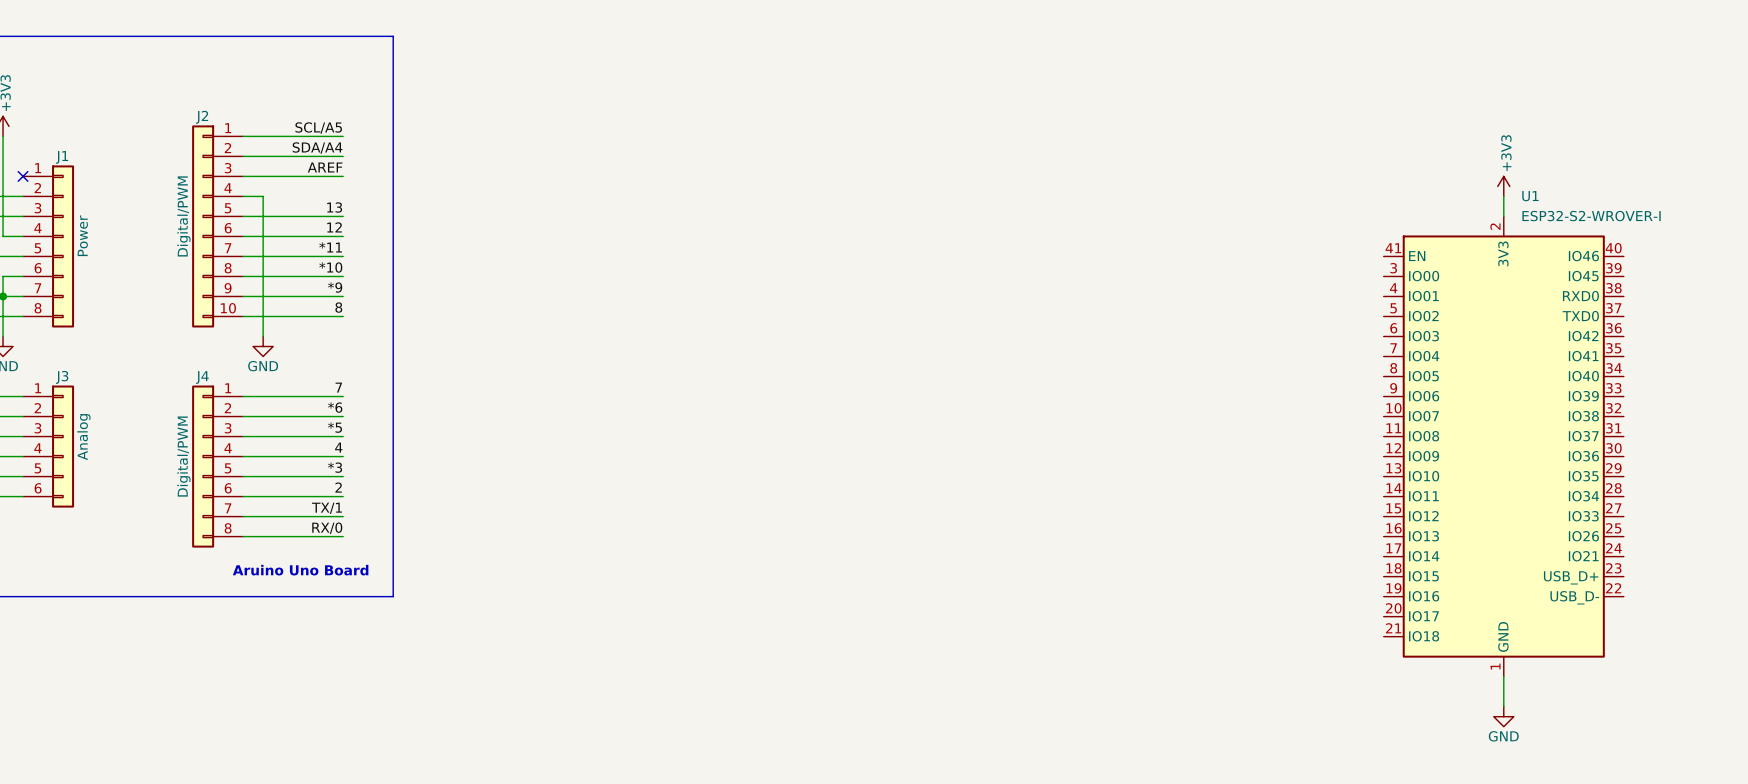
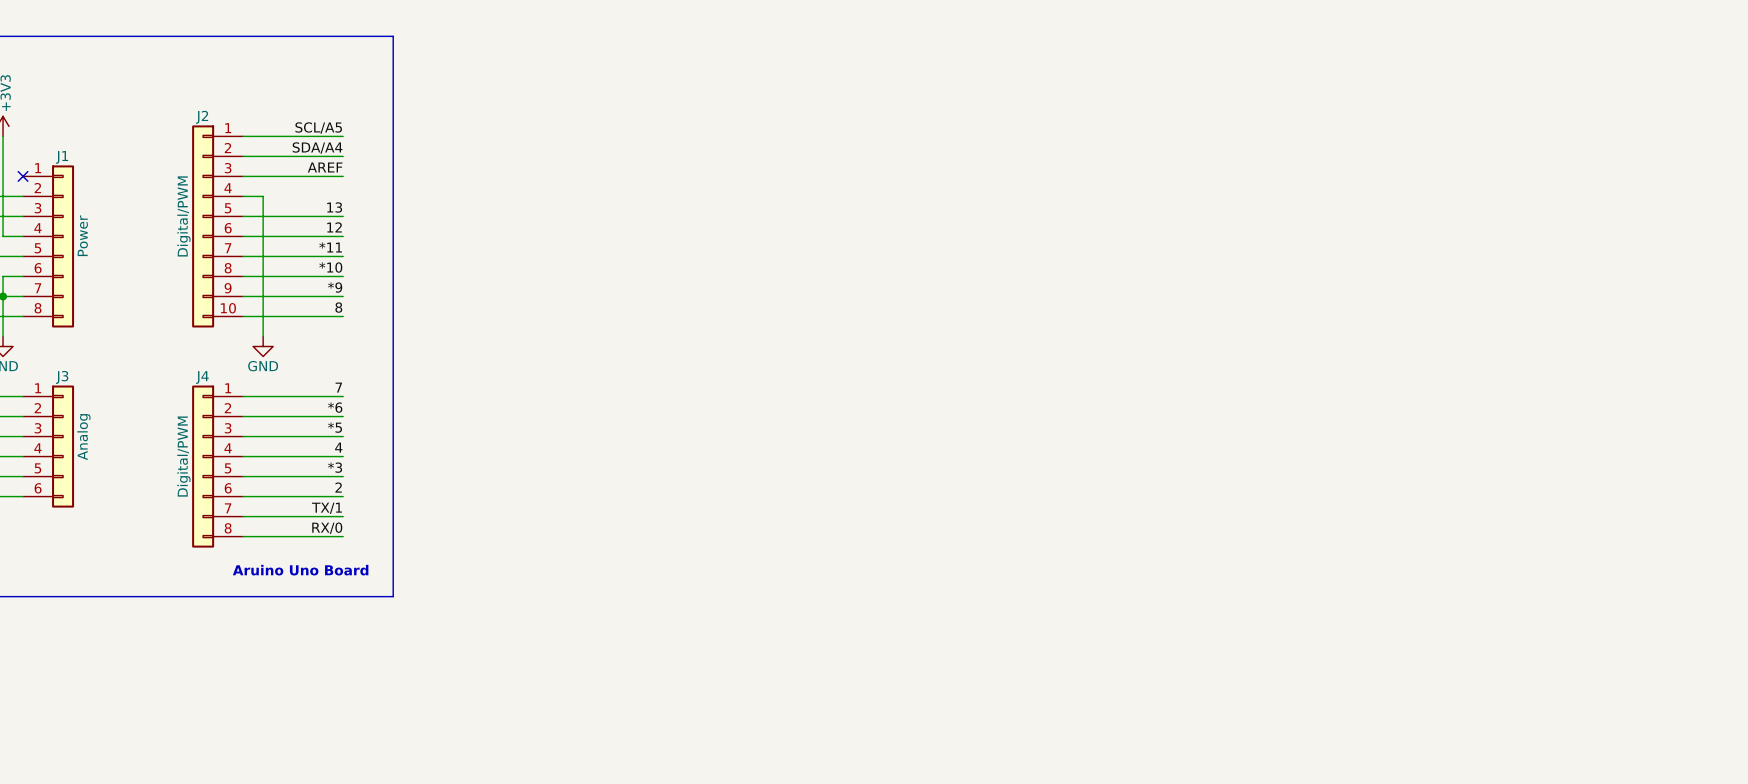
power symbol: +3V3 (1503, 186) -> none
wire: (1503, 196) (1503, 216) -> none
U1: ESP32-S2-WROVER-I (1503, 446) -> none
wire: (1503, 676) (1503, 706) -> none
power symbol: GND (1503, 716) -> none

